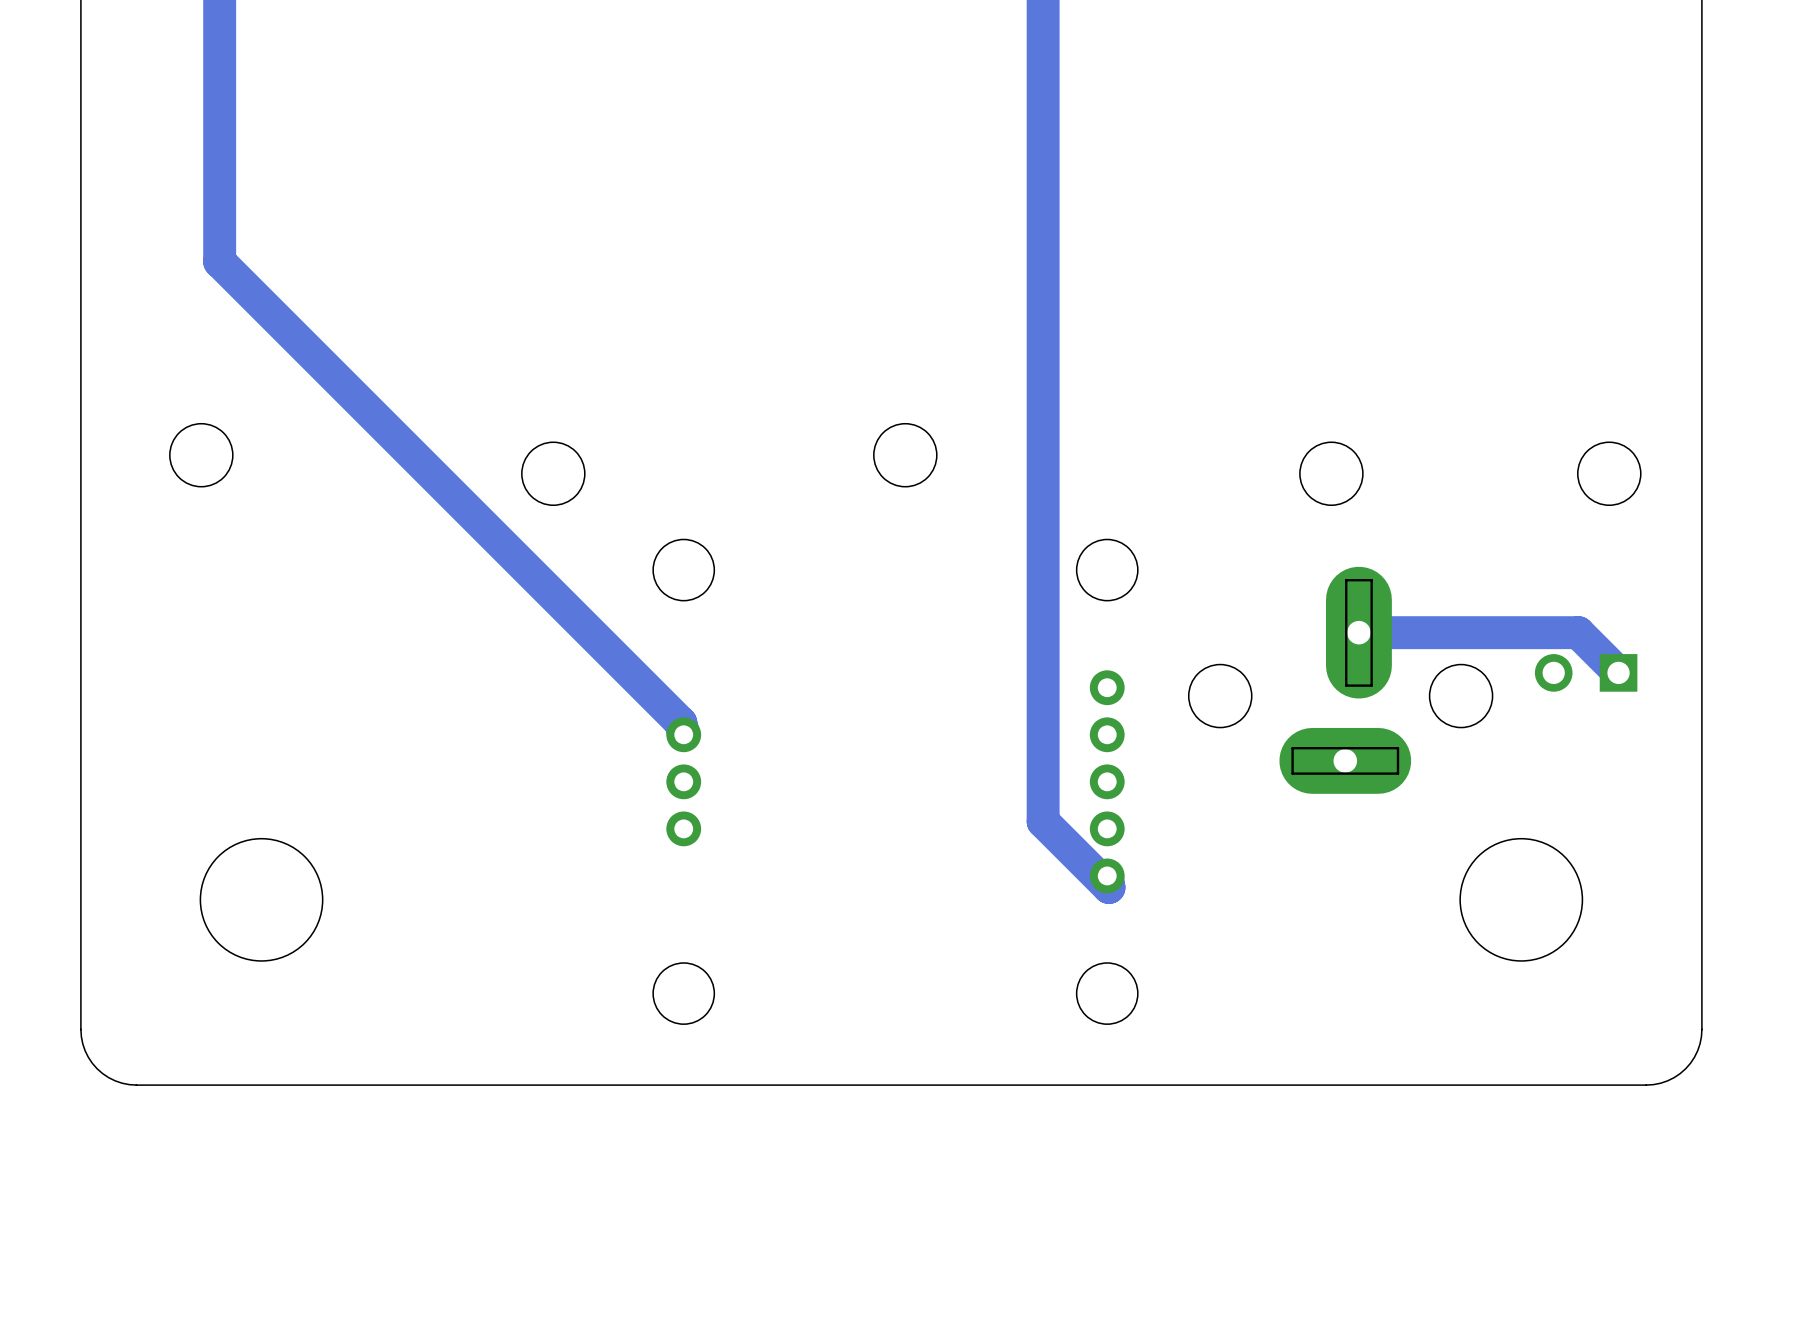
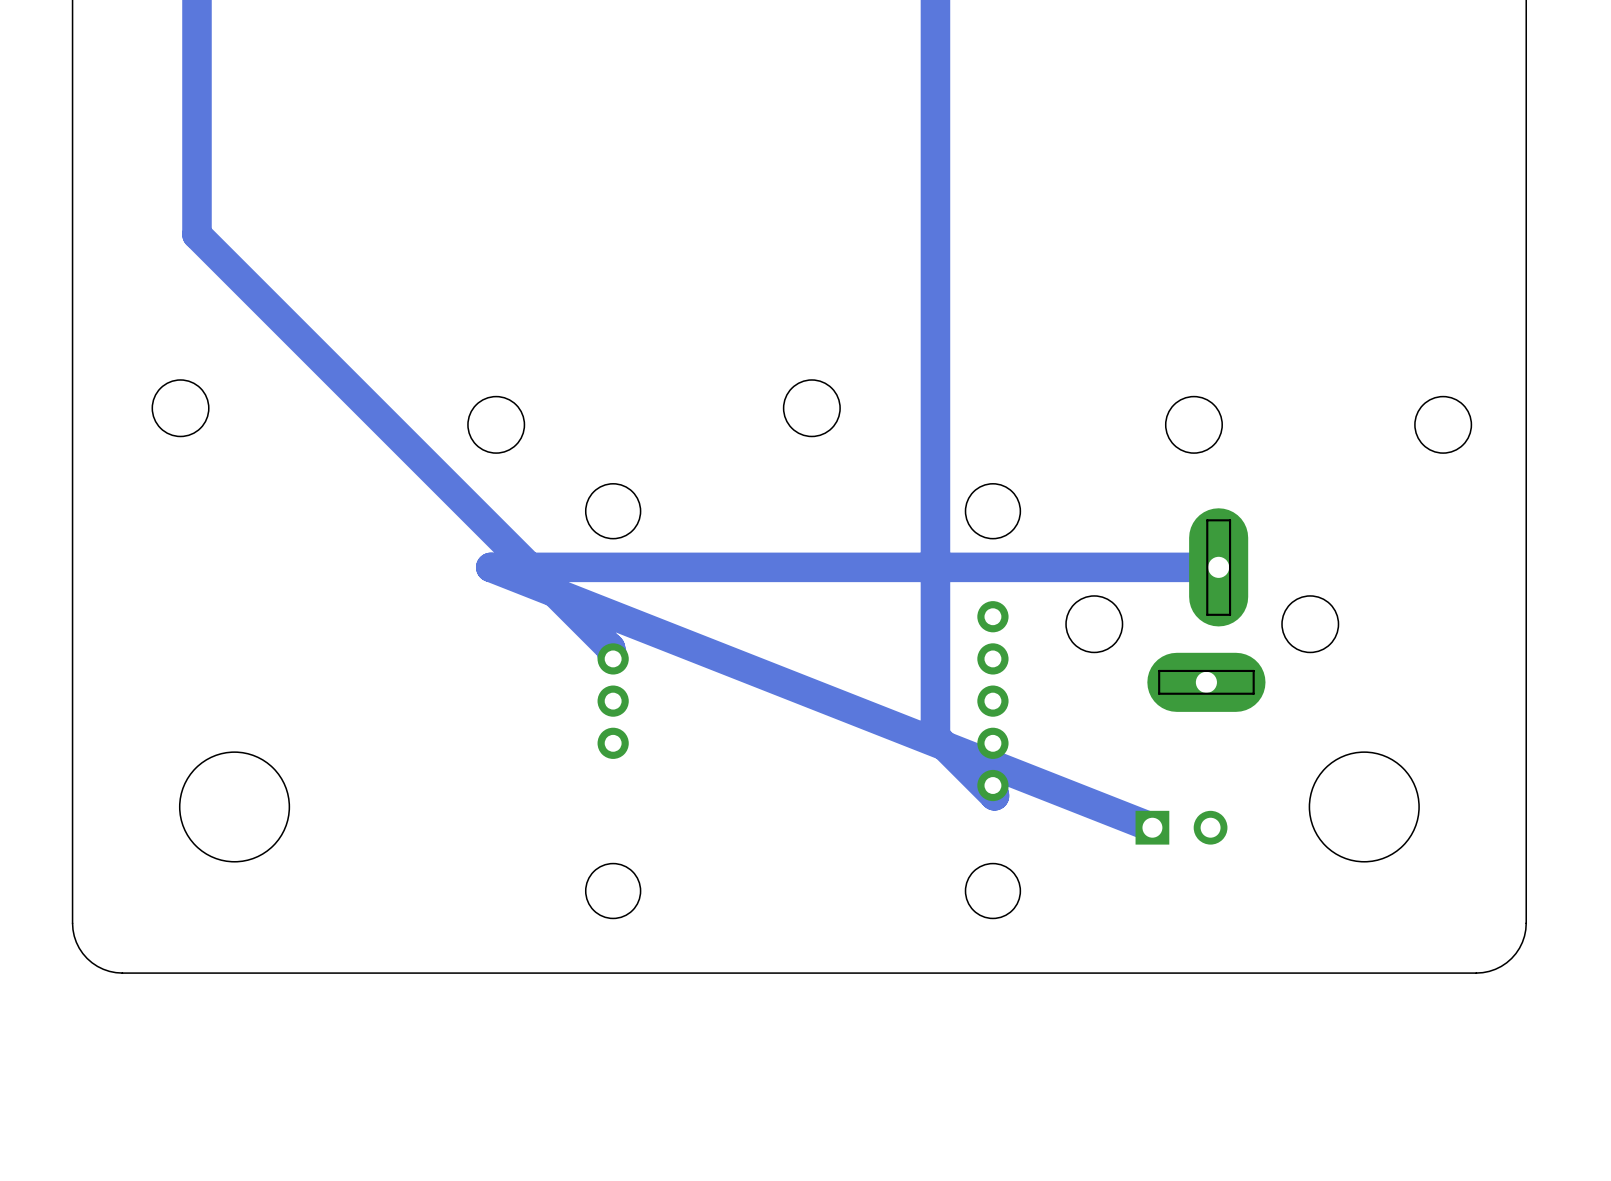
track: (1358, 632) (1578, 632) (1618, 672) -> (1218, 567) (490, 567) (1152, 827)
part rotation: 0° (1586, 672) -> 180° (1181, 827)
part position: (1586, 672) -> (1181, 827)

